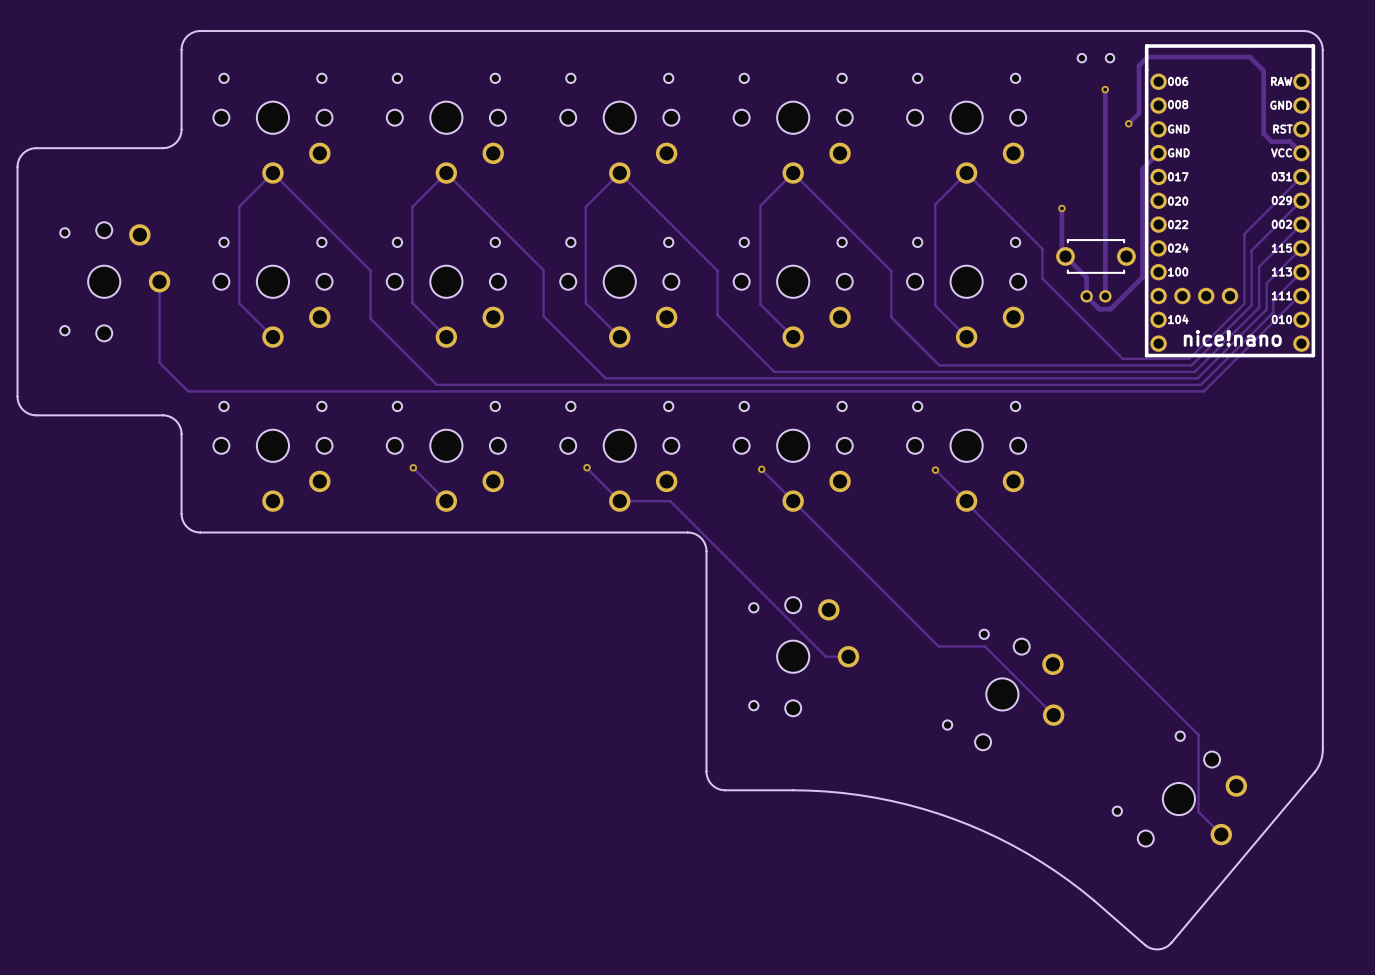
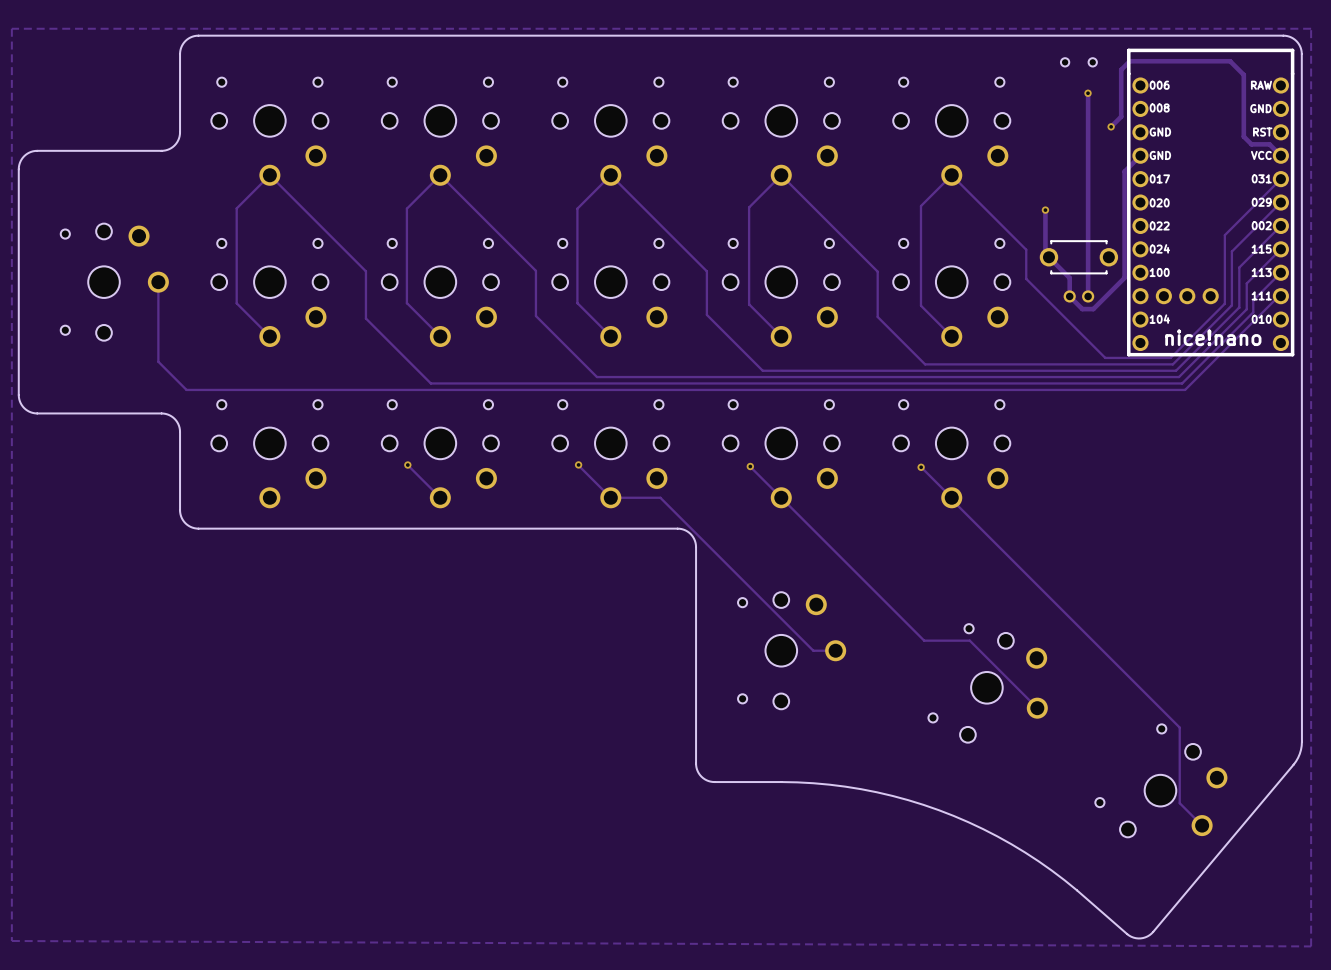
zone outline: none -> (1311, 28) (1311, 946) (11, 940) (11, 28) (1311, 28)

